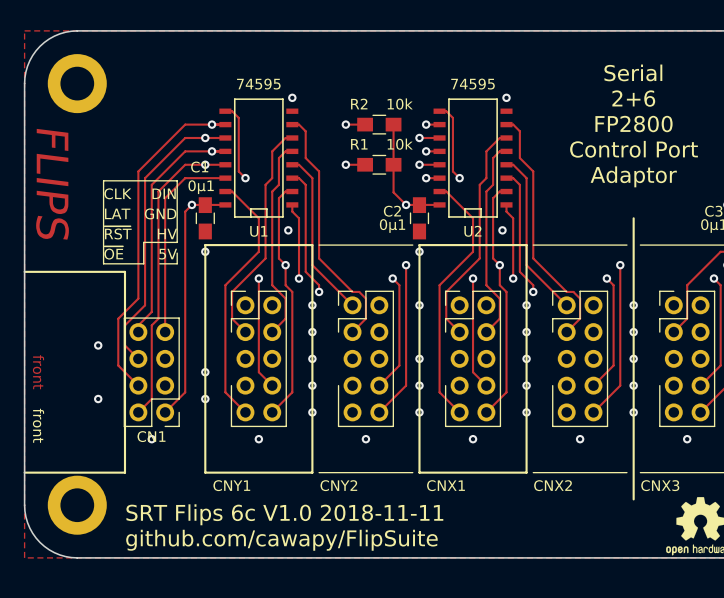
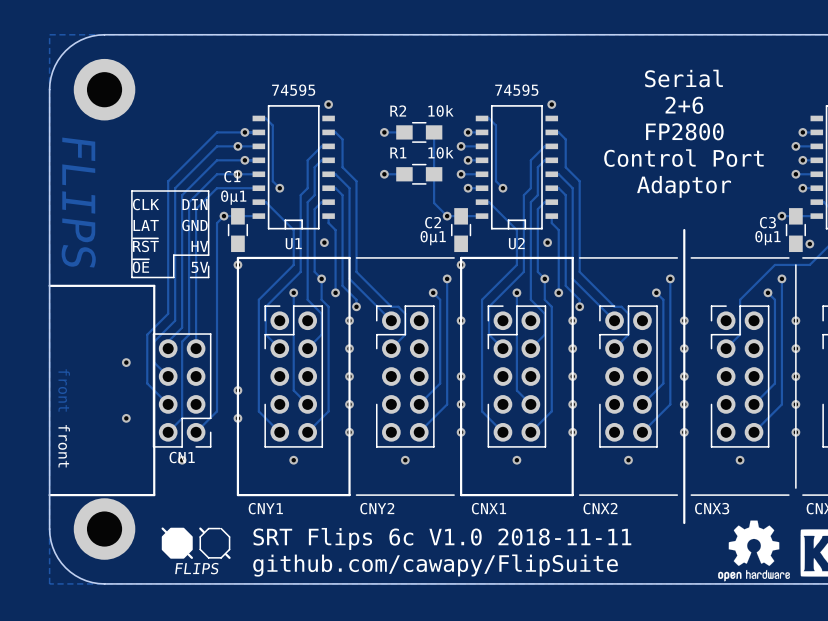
drawing: none -> [161, 527, 231, 559]
text position: SRT Flips 6c V1.0 2018-11-11 (284, 514) -> SRT Flips 6c V1.0 2018-11-11 (442, 538)
text position: github.com/cawapy/FlipSuite (281, 540) -> github.com/cawapy/FlipSuite (435, 565)

